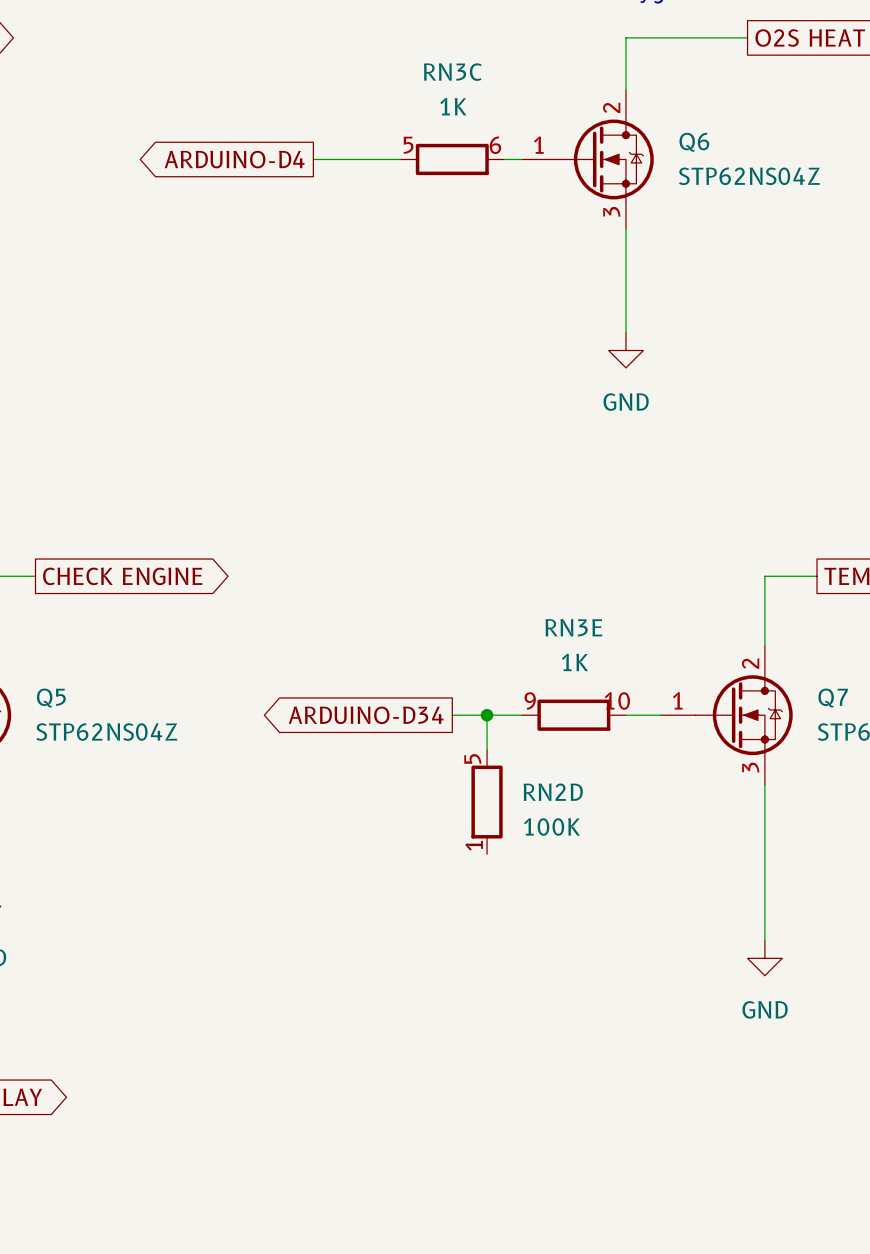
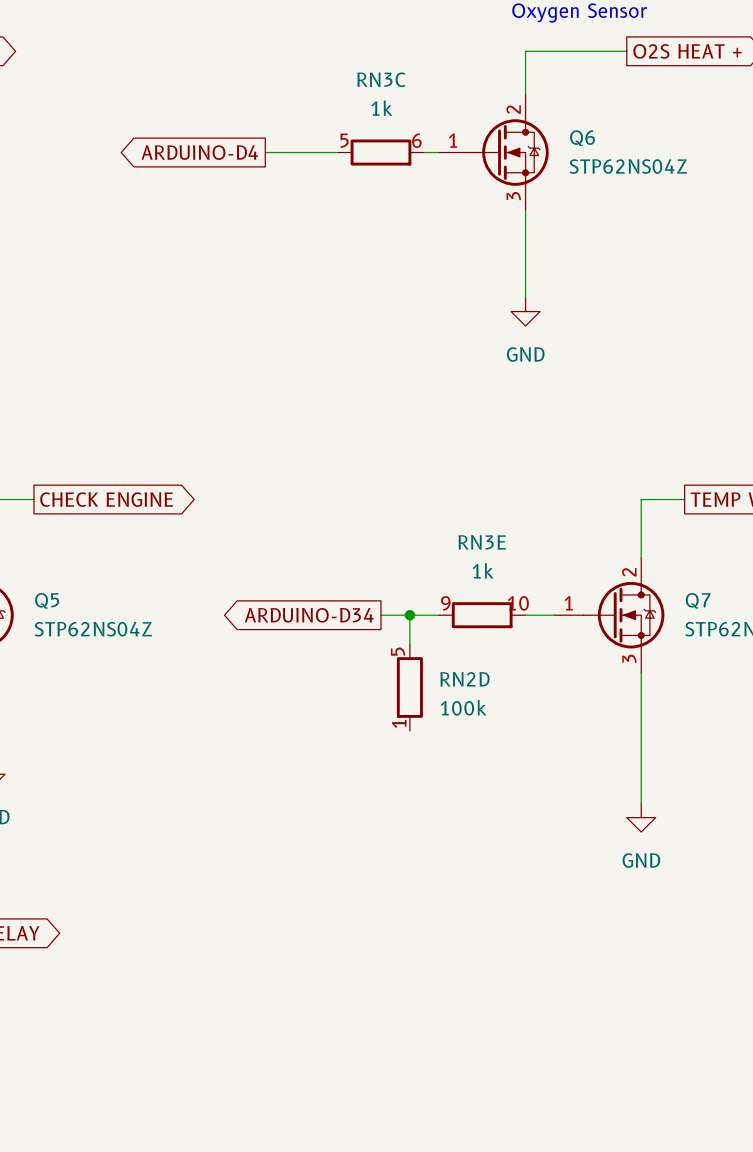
RN3C value: 1K (453, 106) -> 1k (381, 108)
RN3E value: 1K (574, 662) -> 1k (483, 570)
RN2D value: 100K (551, 827) -> 100k (463, 707)

